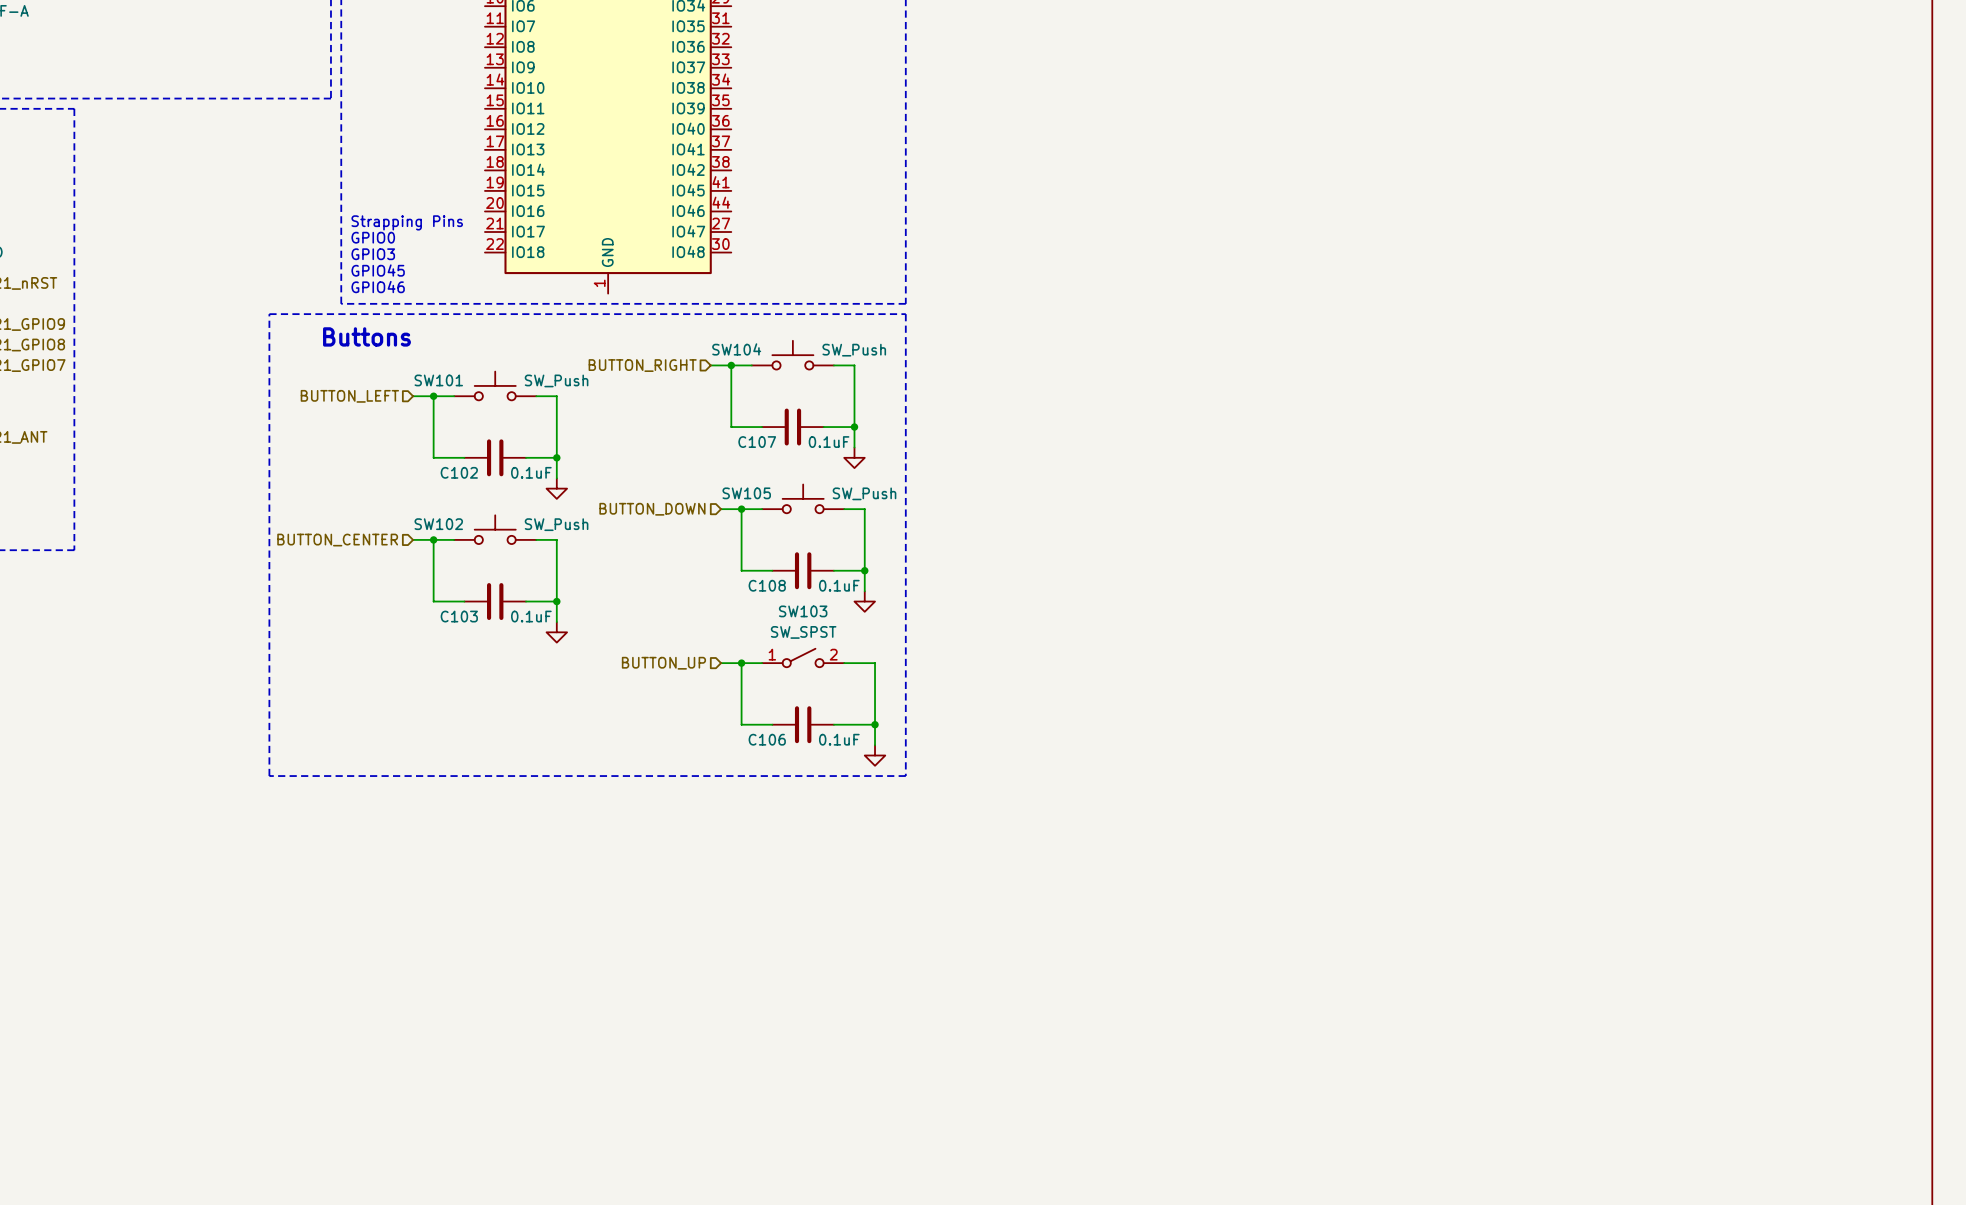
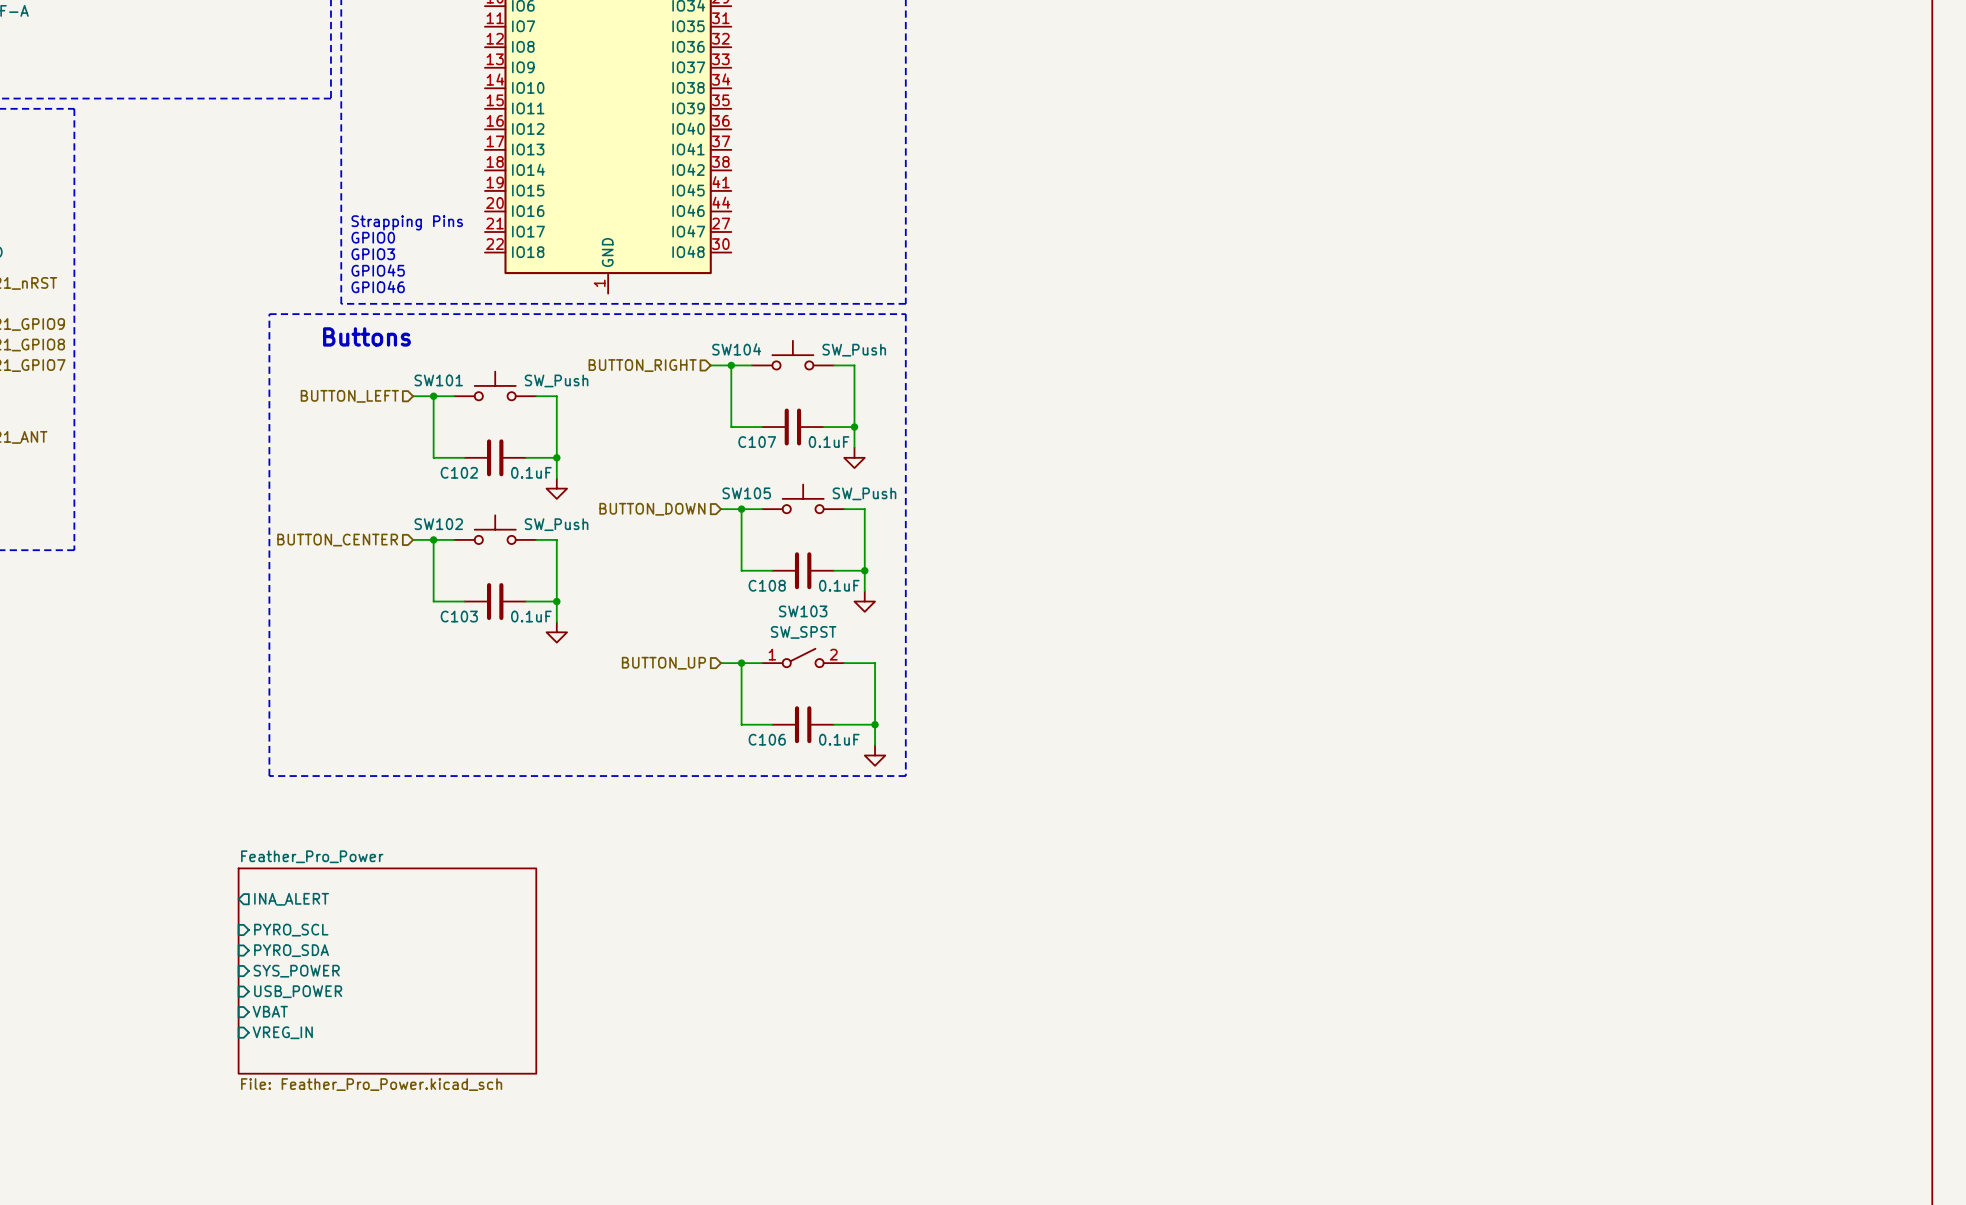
sheet pin: none -> INA_ALERT (291, 899)
sheet pin: none -> PYRO_SCL (291, 930)
sheet pin: none -> PYRO_SDA (291, 950)
sheet pin: none -> SYS_POWER (296, 971)
sheet Feather_Pro_Power: none -> File: Feather_Pro_Power.kicad_sch (387, 971)
sheet pin: none -> USB_POWER (298, 991)
sheet pin: none -> VBAT (270, 1011)
sheet pin: none -> VREG_IN (282, 1032)

